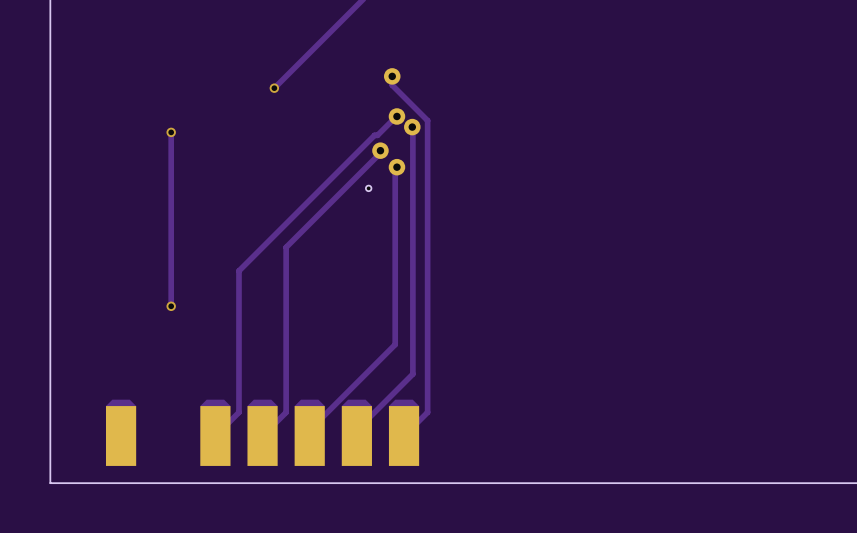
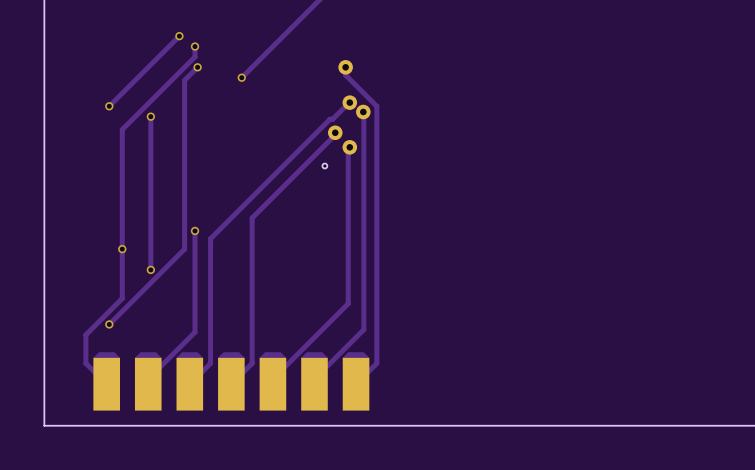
track: none -> (179, 36) (109, 106)
via: none -> (179, 36)
track: none -> (195, 46) (195, 56) (122, 129) (122, 298) (85, 334) (85, 363) (106, 384)
via: none -> (195, 46)
track: none -> (197, 67) (184, 80) (184, 249) (109, 324)
via: none -> (197, 67)
via: none -> (109, 106)
track: none -> (195, 230) (195, 332) (148, 379) (148, 384)
via: none -> (195, 230)
via: none -> (122, 249)
via: none -> (109, 324)
part: none -> (148, 381)

